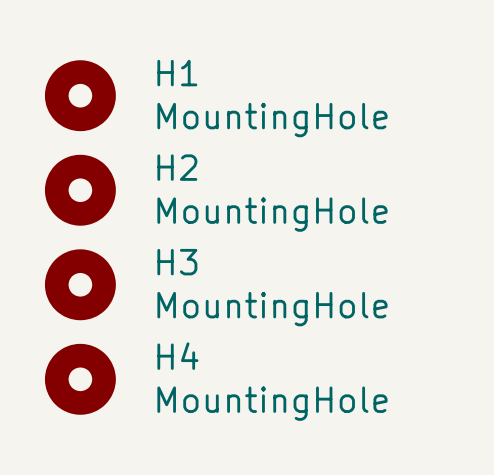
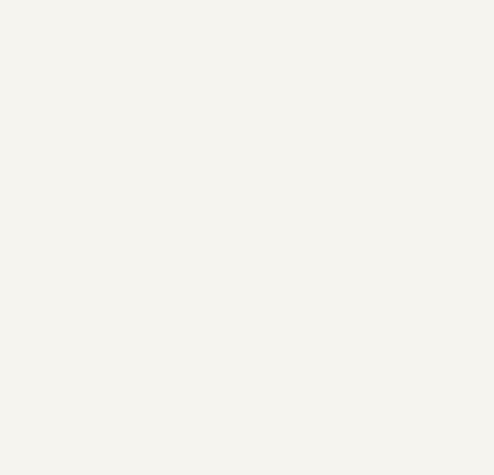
H1: MountingHole (80, 95) -> none
H2: MountingHole (80, 190) -> none
H3: MountingHole (80, 284) -> none
H4: MountingHole (80, 379) -> none

